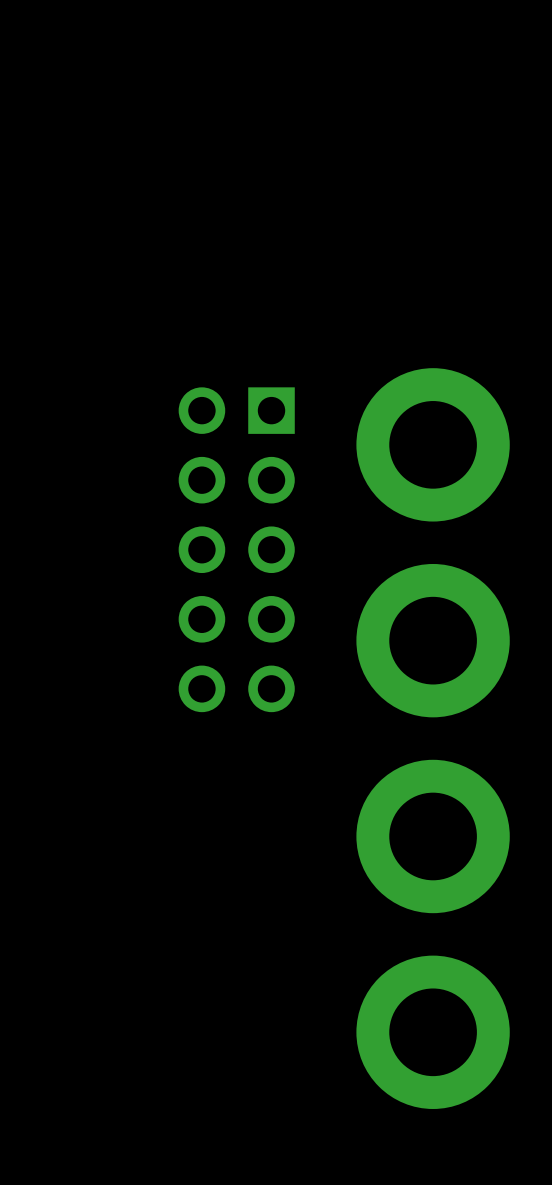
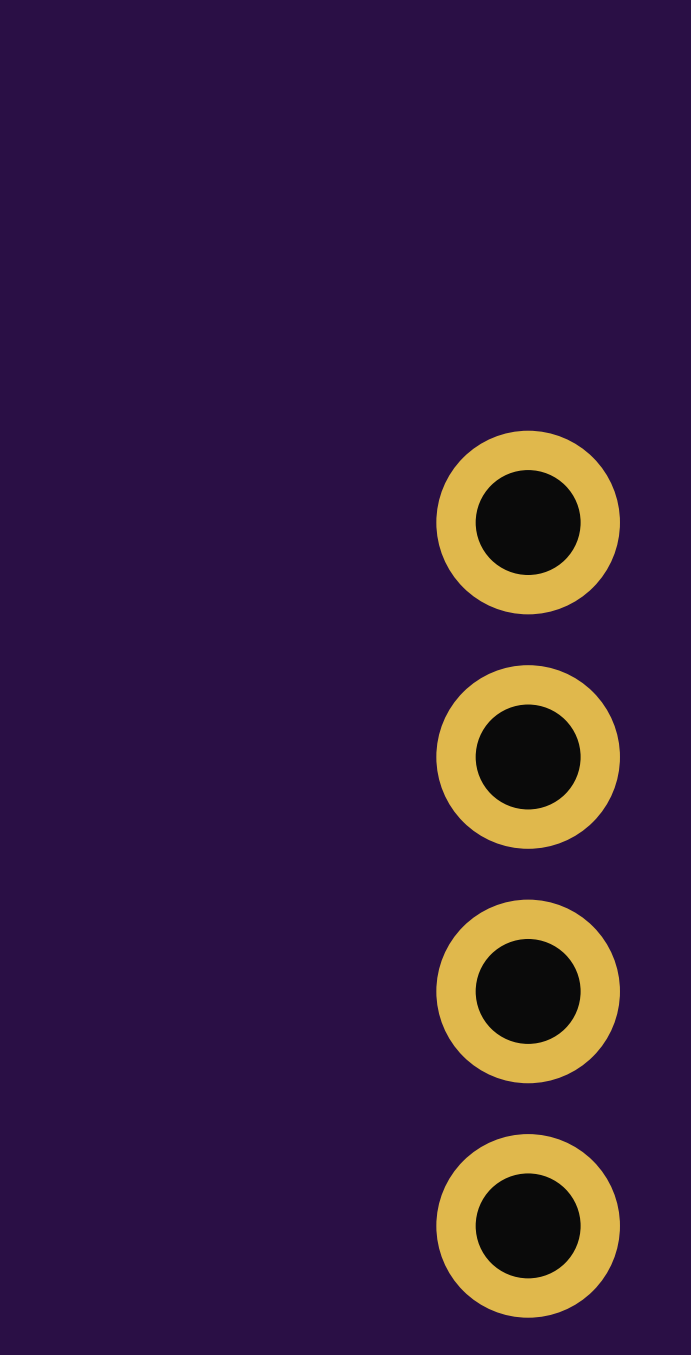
part: (236, 549) -> none

